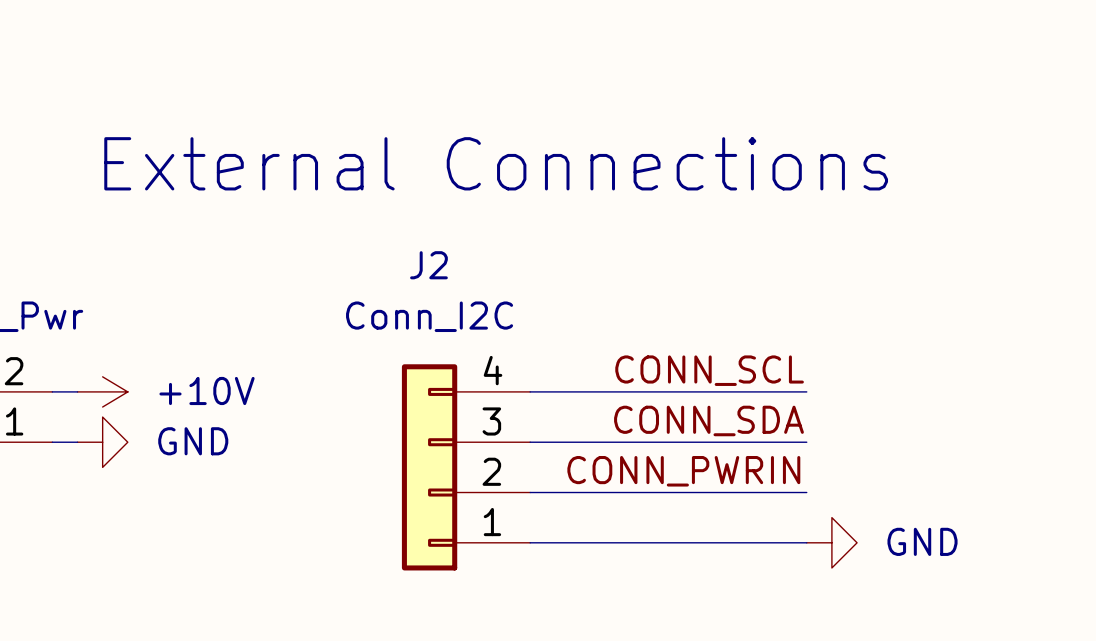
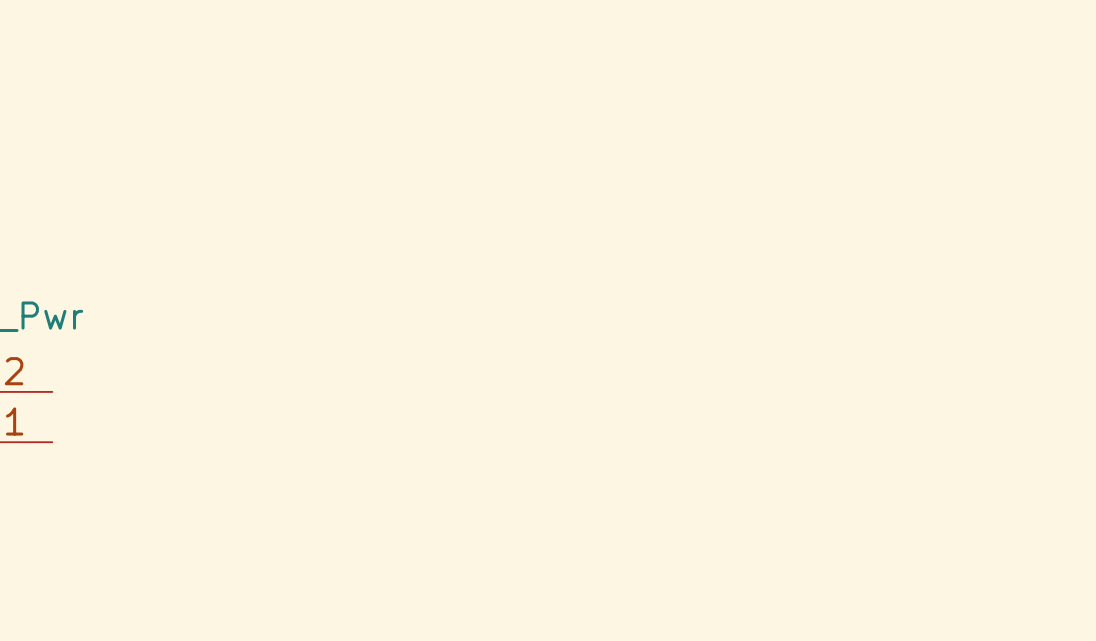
text: External Connections (496, 163) -> none
label: CONN_SCL (709, 370) -> none
wire: (52, 391) (77, 391) -> none
power symbol: +10V (102, 391) -> none
wire: (530, 391) (806, 391) -> none
label: CONN_SDA (708, 420) -> none
wire: (52, 442) (77, 442) -> none
power symbol: GND (102, 442) -> none
wire: (530, 442) (806, 442) -> none
J2: Conn_I2C (466, 467) -> none
label: CONN_PWRIN (683, 471) -> none
wire: (530, 492) (806, 492) -> none
wire: (530, 542) (806, 542) -> none
power symbol: GND (831, 542) -> none

